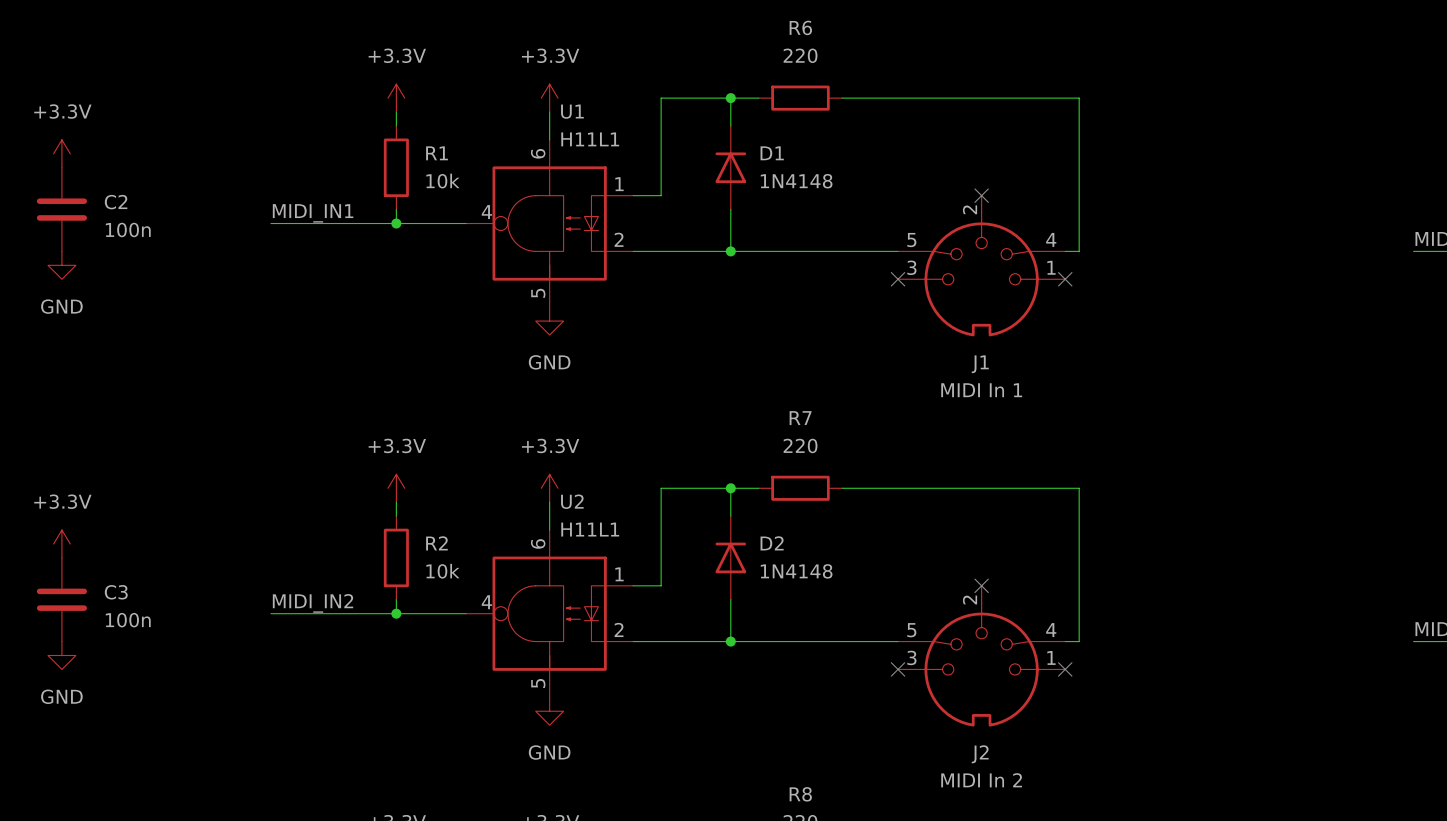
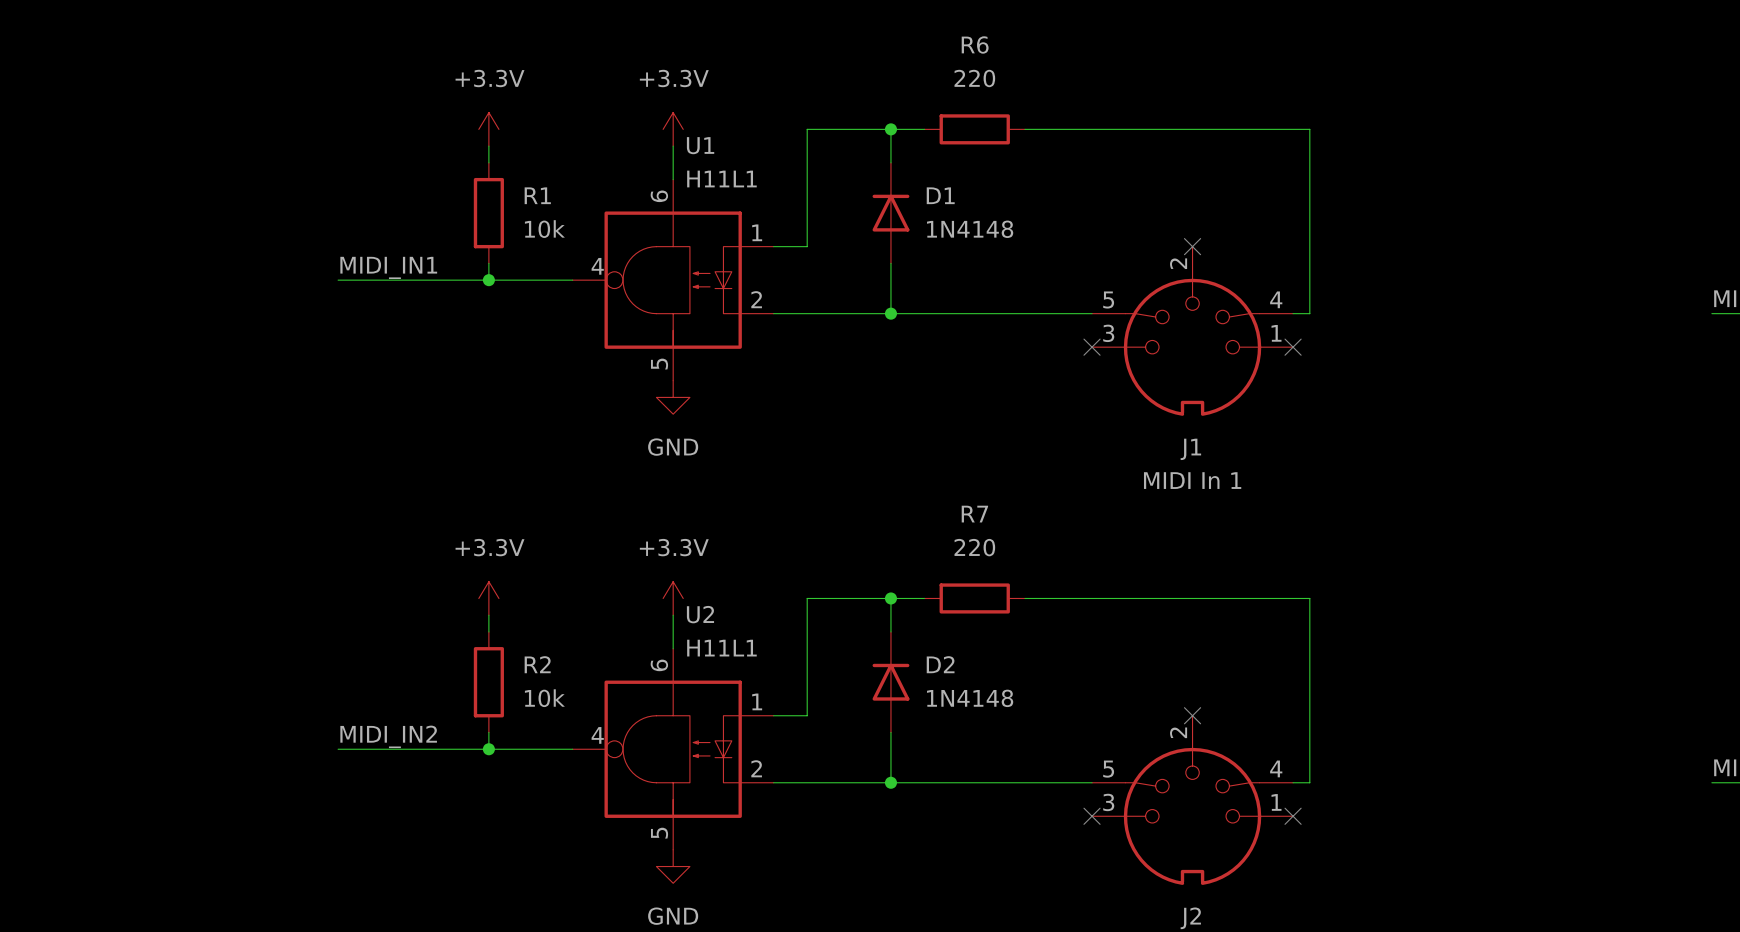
power symbol: +3.3V (61, 153) -> none
C2: 100n (61, 209) -> none
power symbol: GND (61, 265) -> none
power symbol: +3.3V (61, 544) -> none
C3: 100n (61, 599) -> none
power symbol: GND (61, 655) -> none

